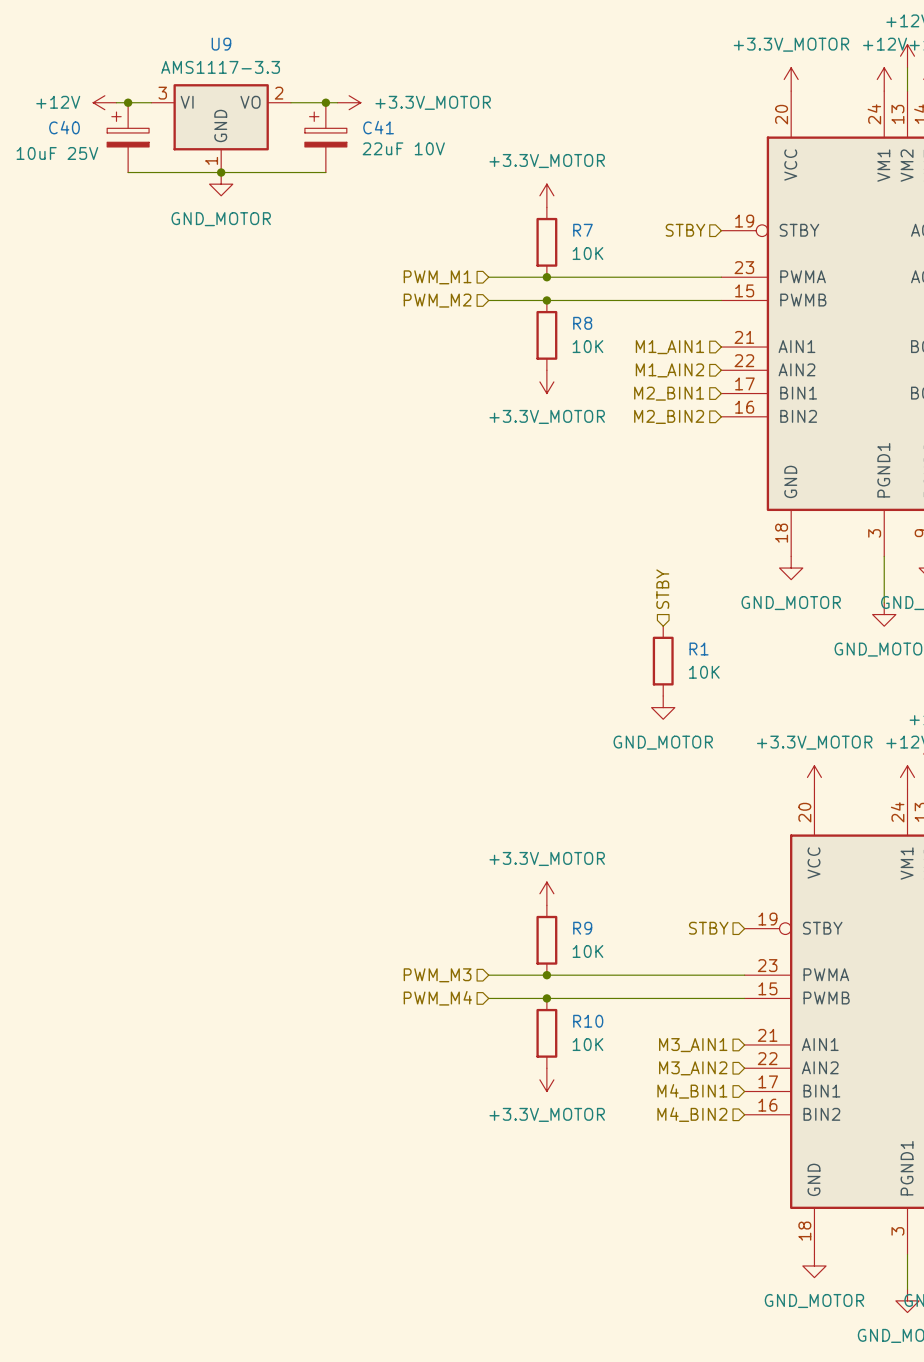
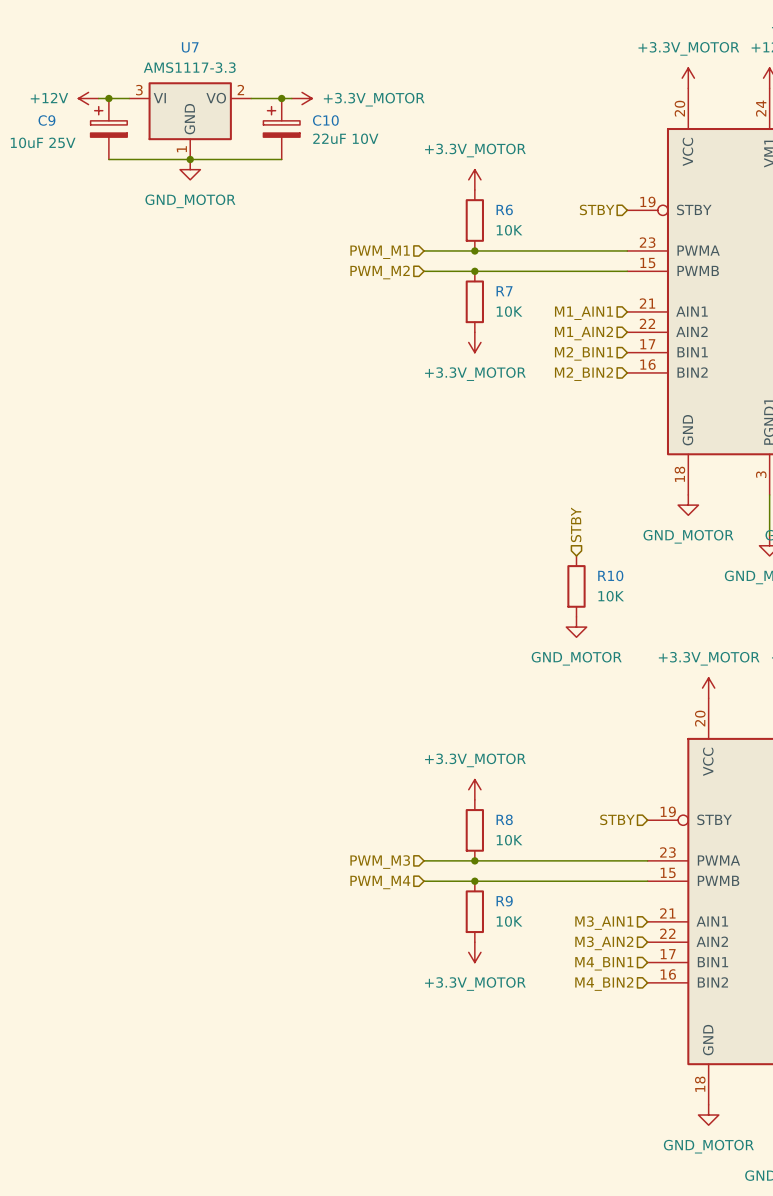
U9 name: U9 (221, 44) -> U7 (190, 47)
C40 name: C40 (64, 127) -> C9 (46, 120)
C41 name: C41 (378, 127) -> C10 (325, 120)
R7 name: R7 (582, 230) -> R6 (504, 209)
R8 name: R8 (582, 323) -> R7 (504, 291)
R1 name: R1 (699, 649) -> R10 (610, 575)
R9 name: R9 (582, 928) -> R8 (504, 819)
R10 name: R10 (588, 1021) -> R9 (504, 901)

